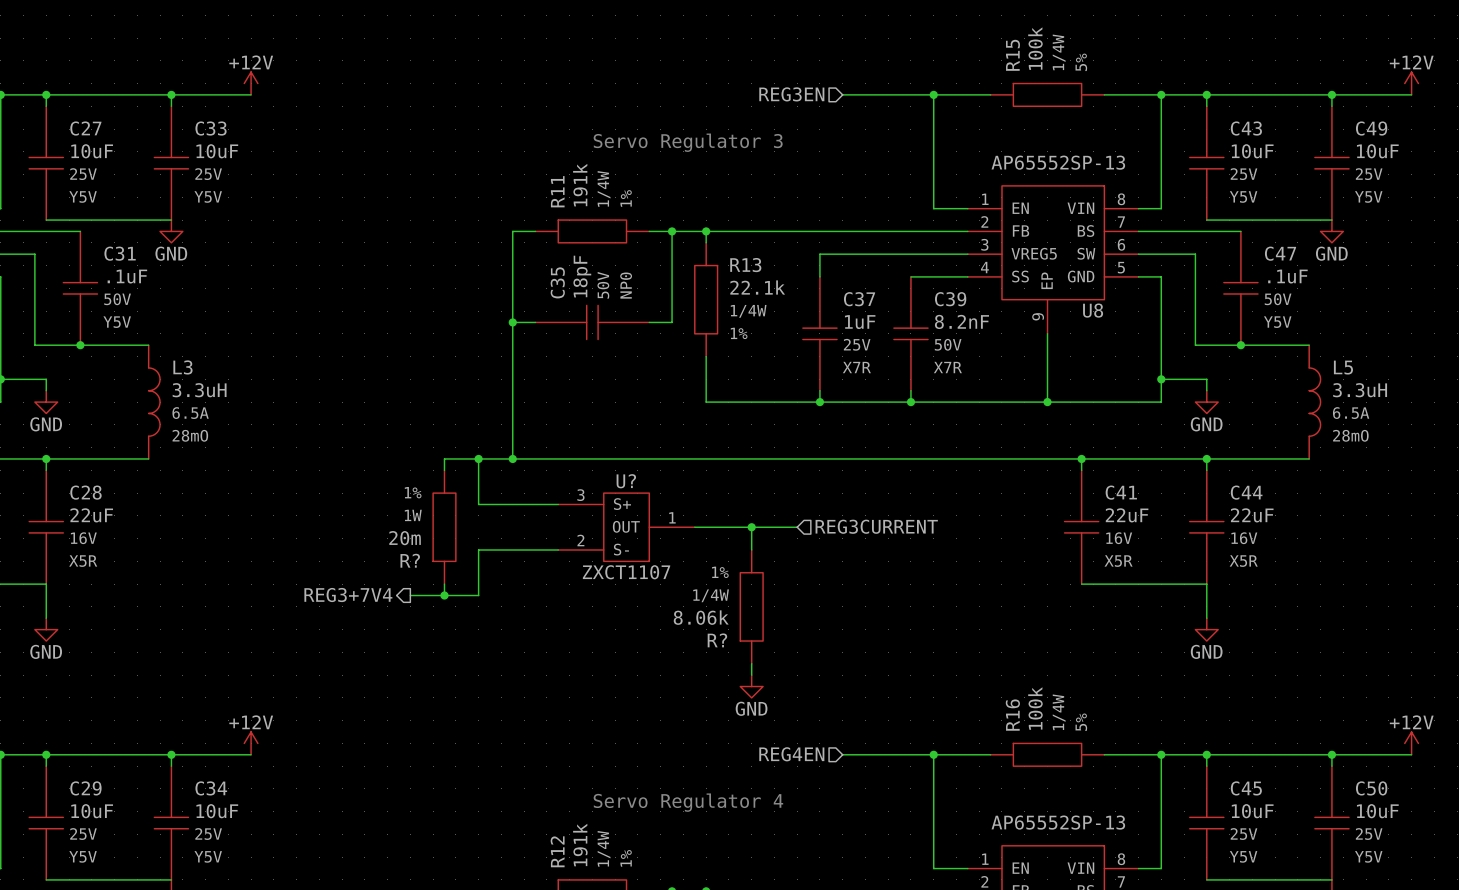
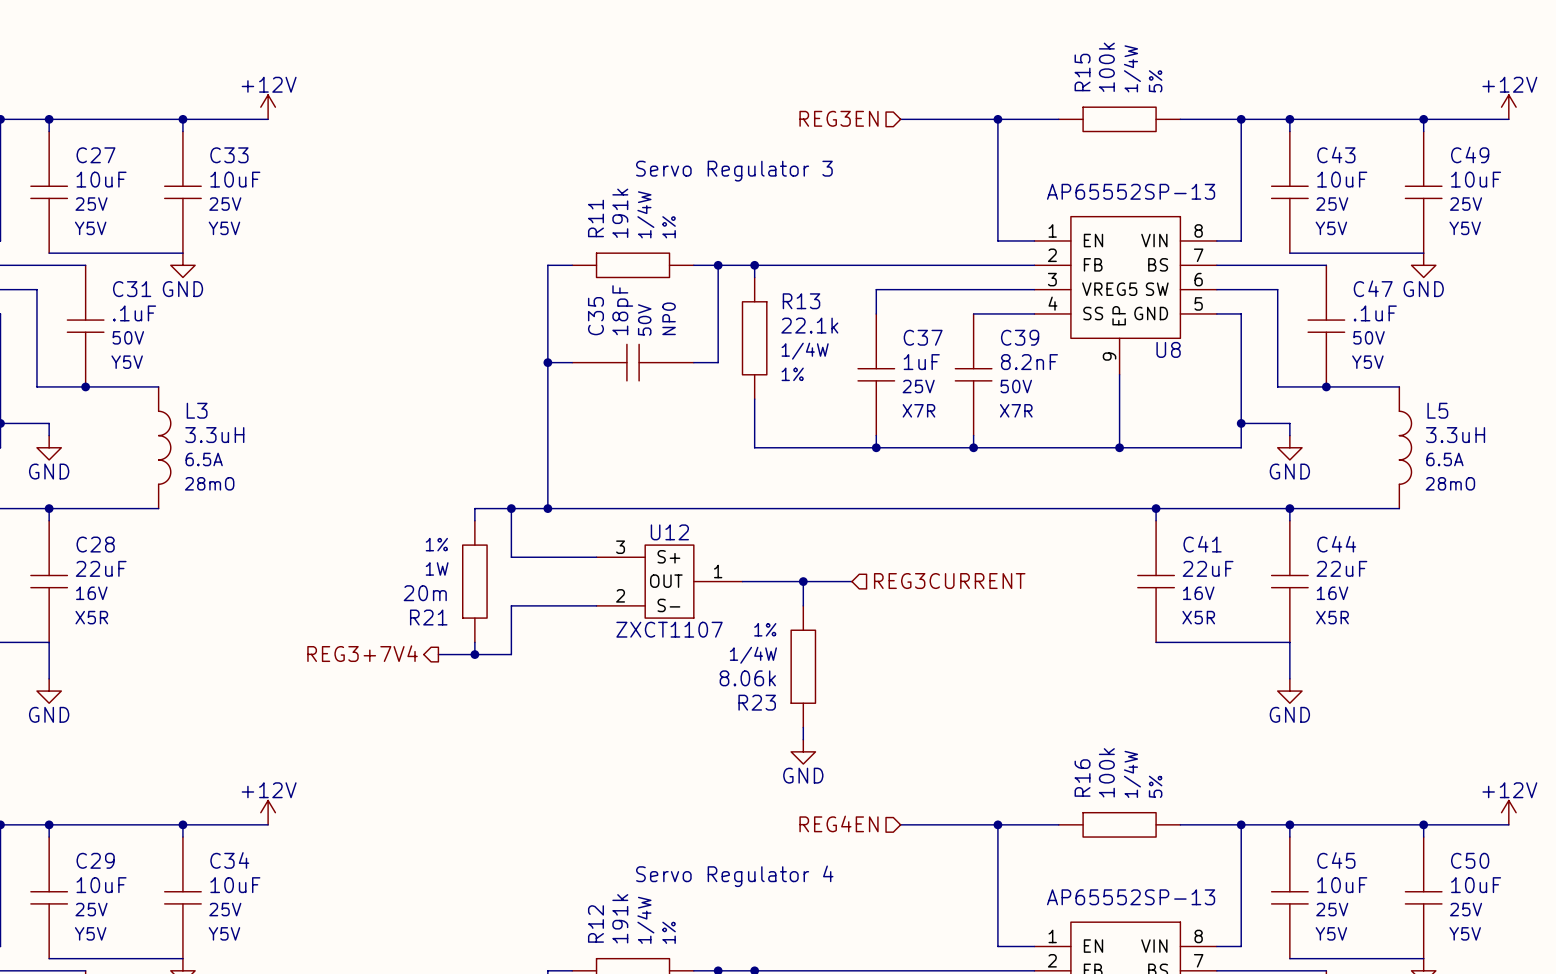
U? name: U? (626, 481) -> U12 (669, 532)
R? name: R? (410, 560) -> R21 (428, 617)
R? name: R? (717, 640) -> R23 (757, 702)

